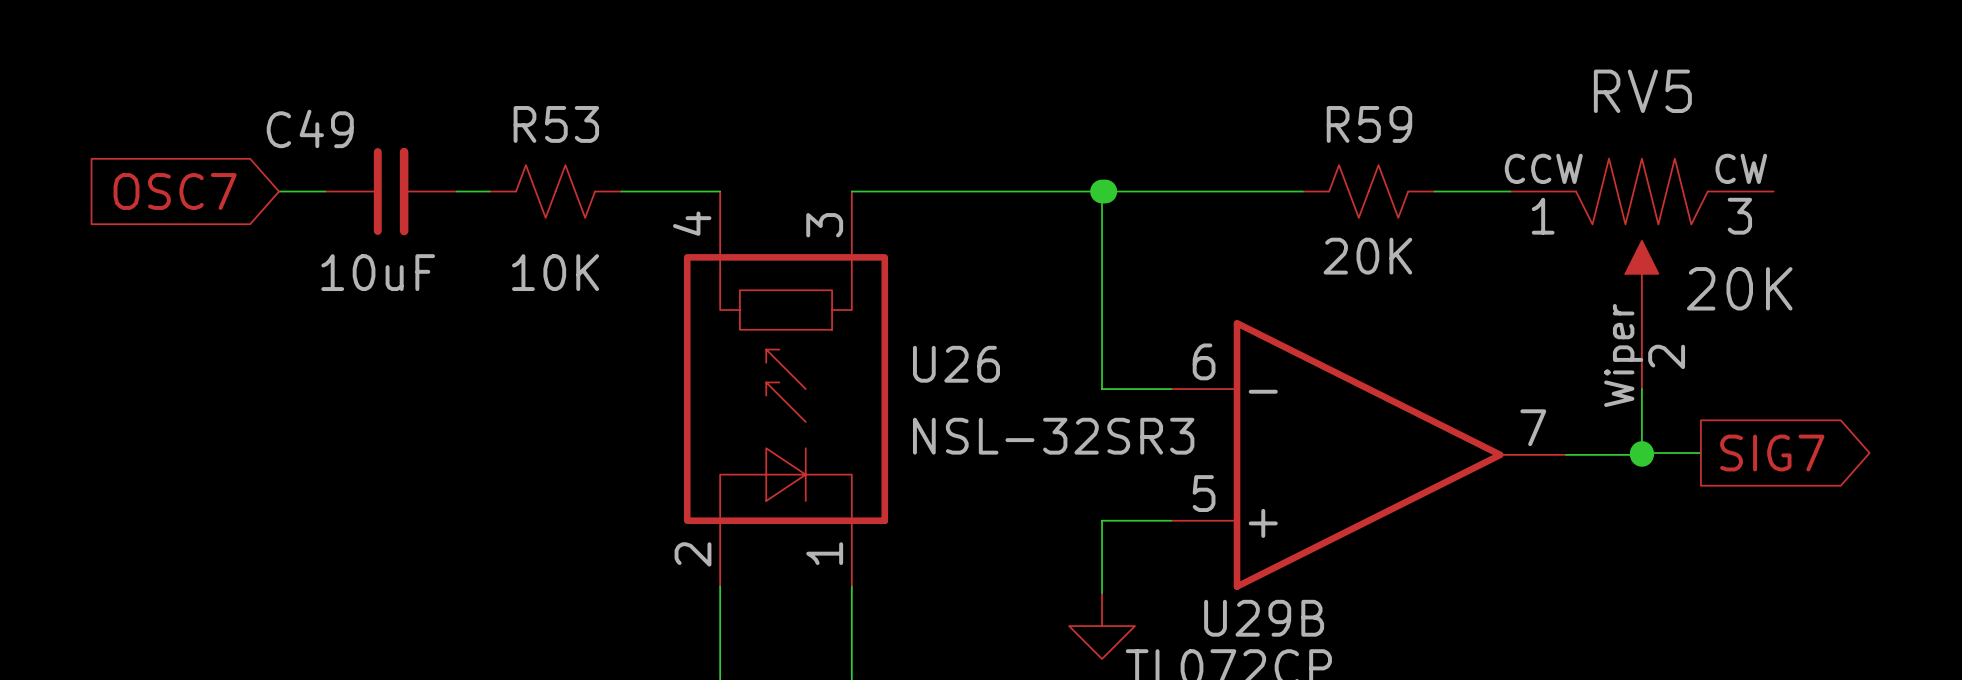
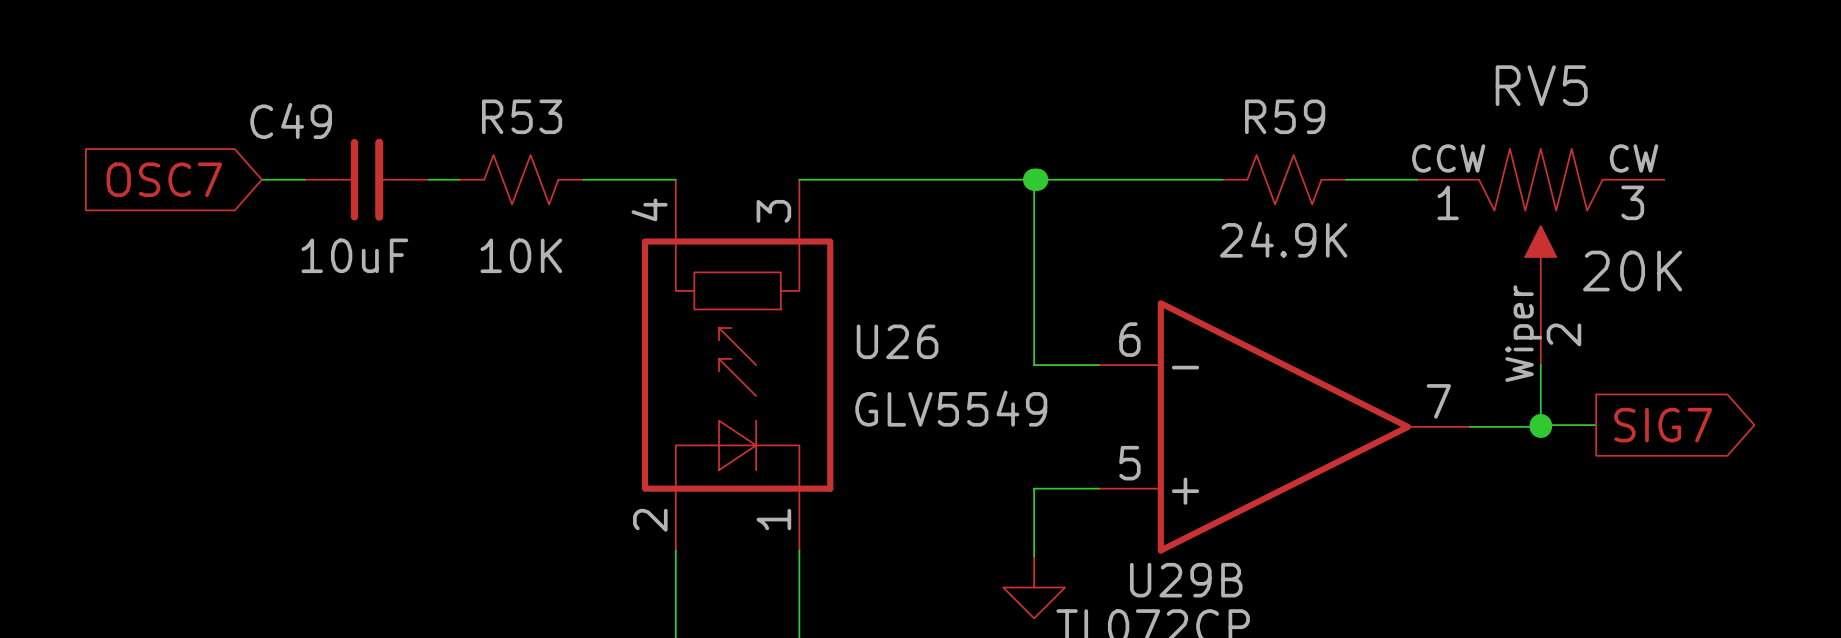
R59 value: 20K (1367, 256) -> 24.9K (1283, 239)
U26 value: NSL-32SR3 (1053, 436) -> GLV5549 (951, 408)

